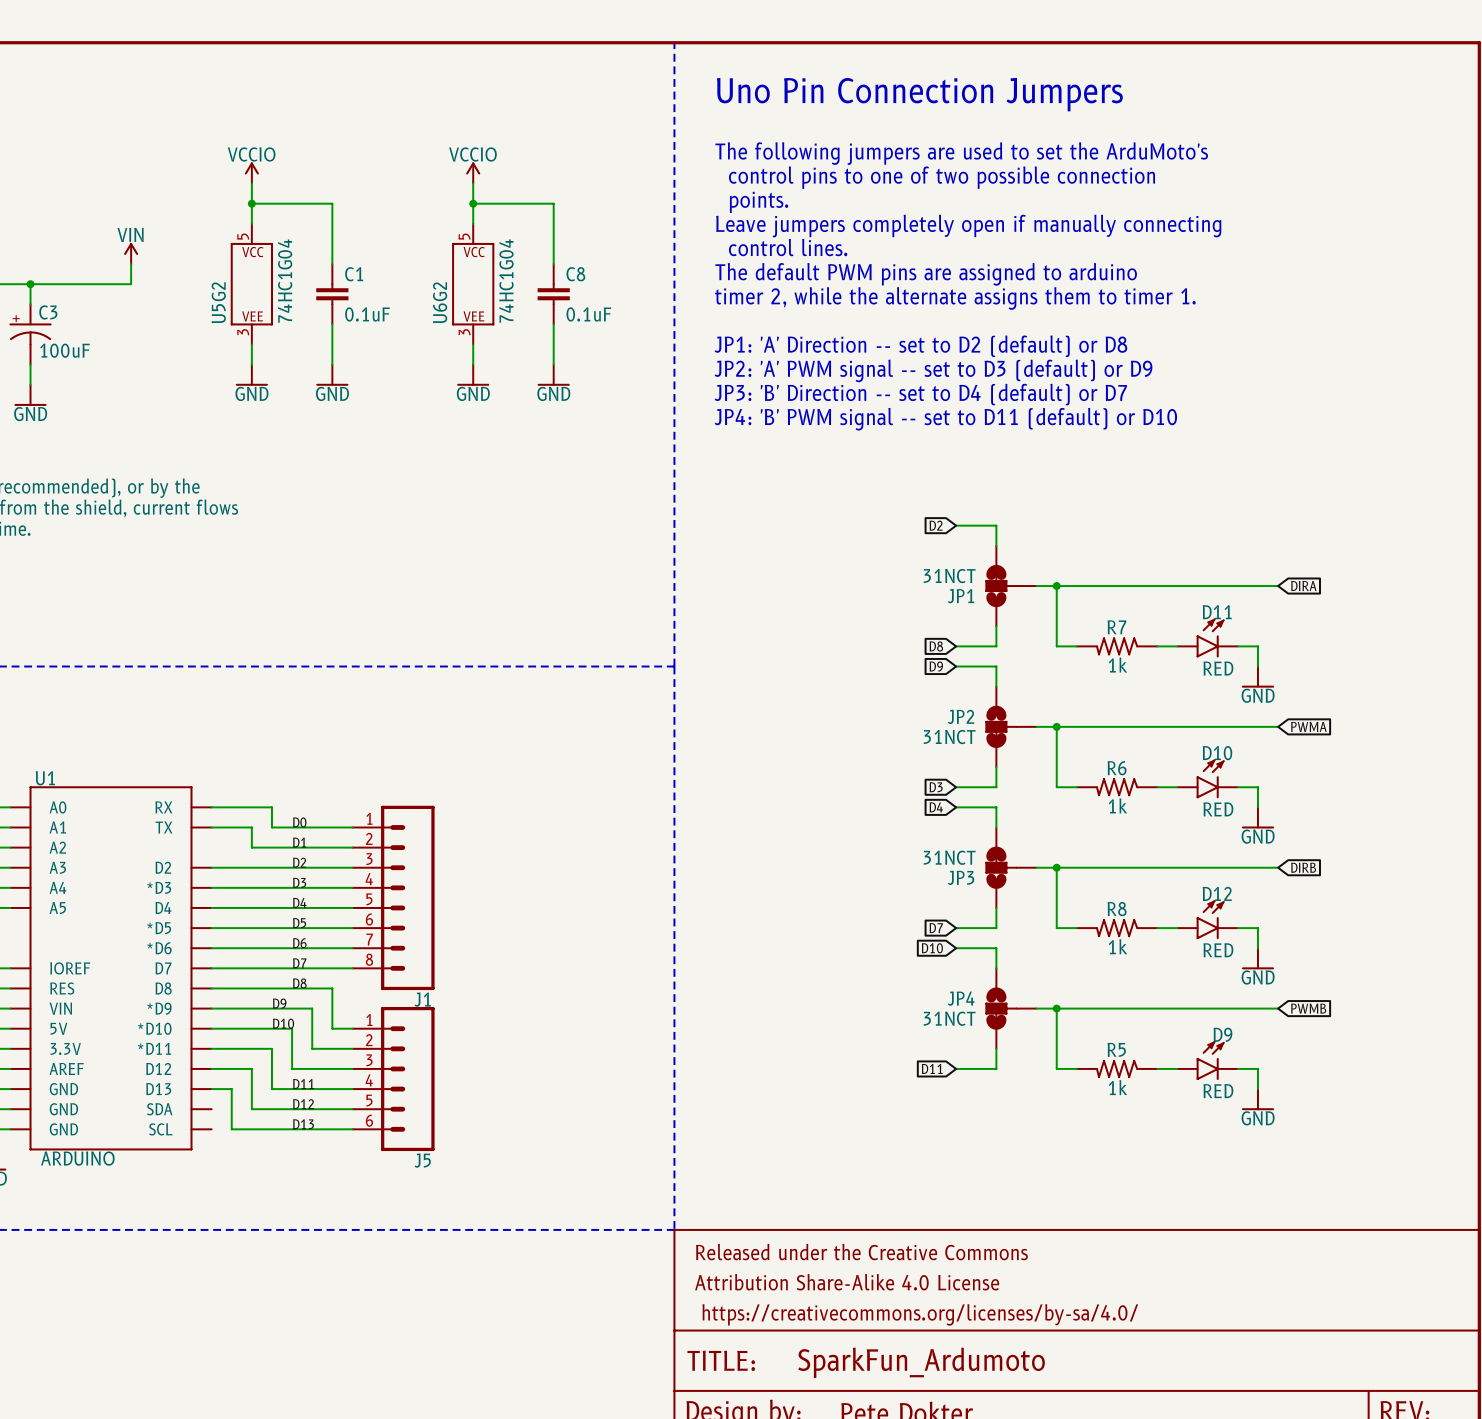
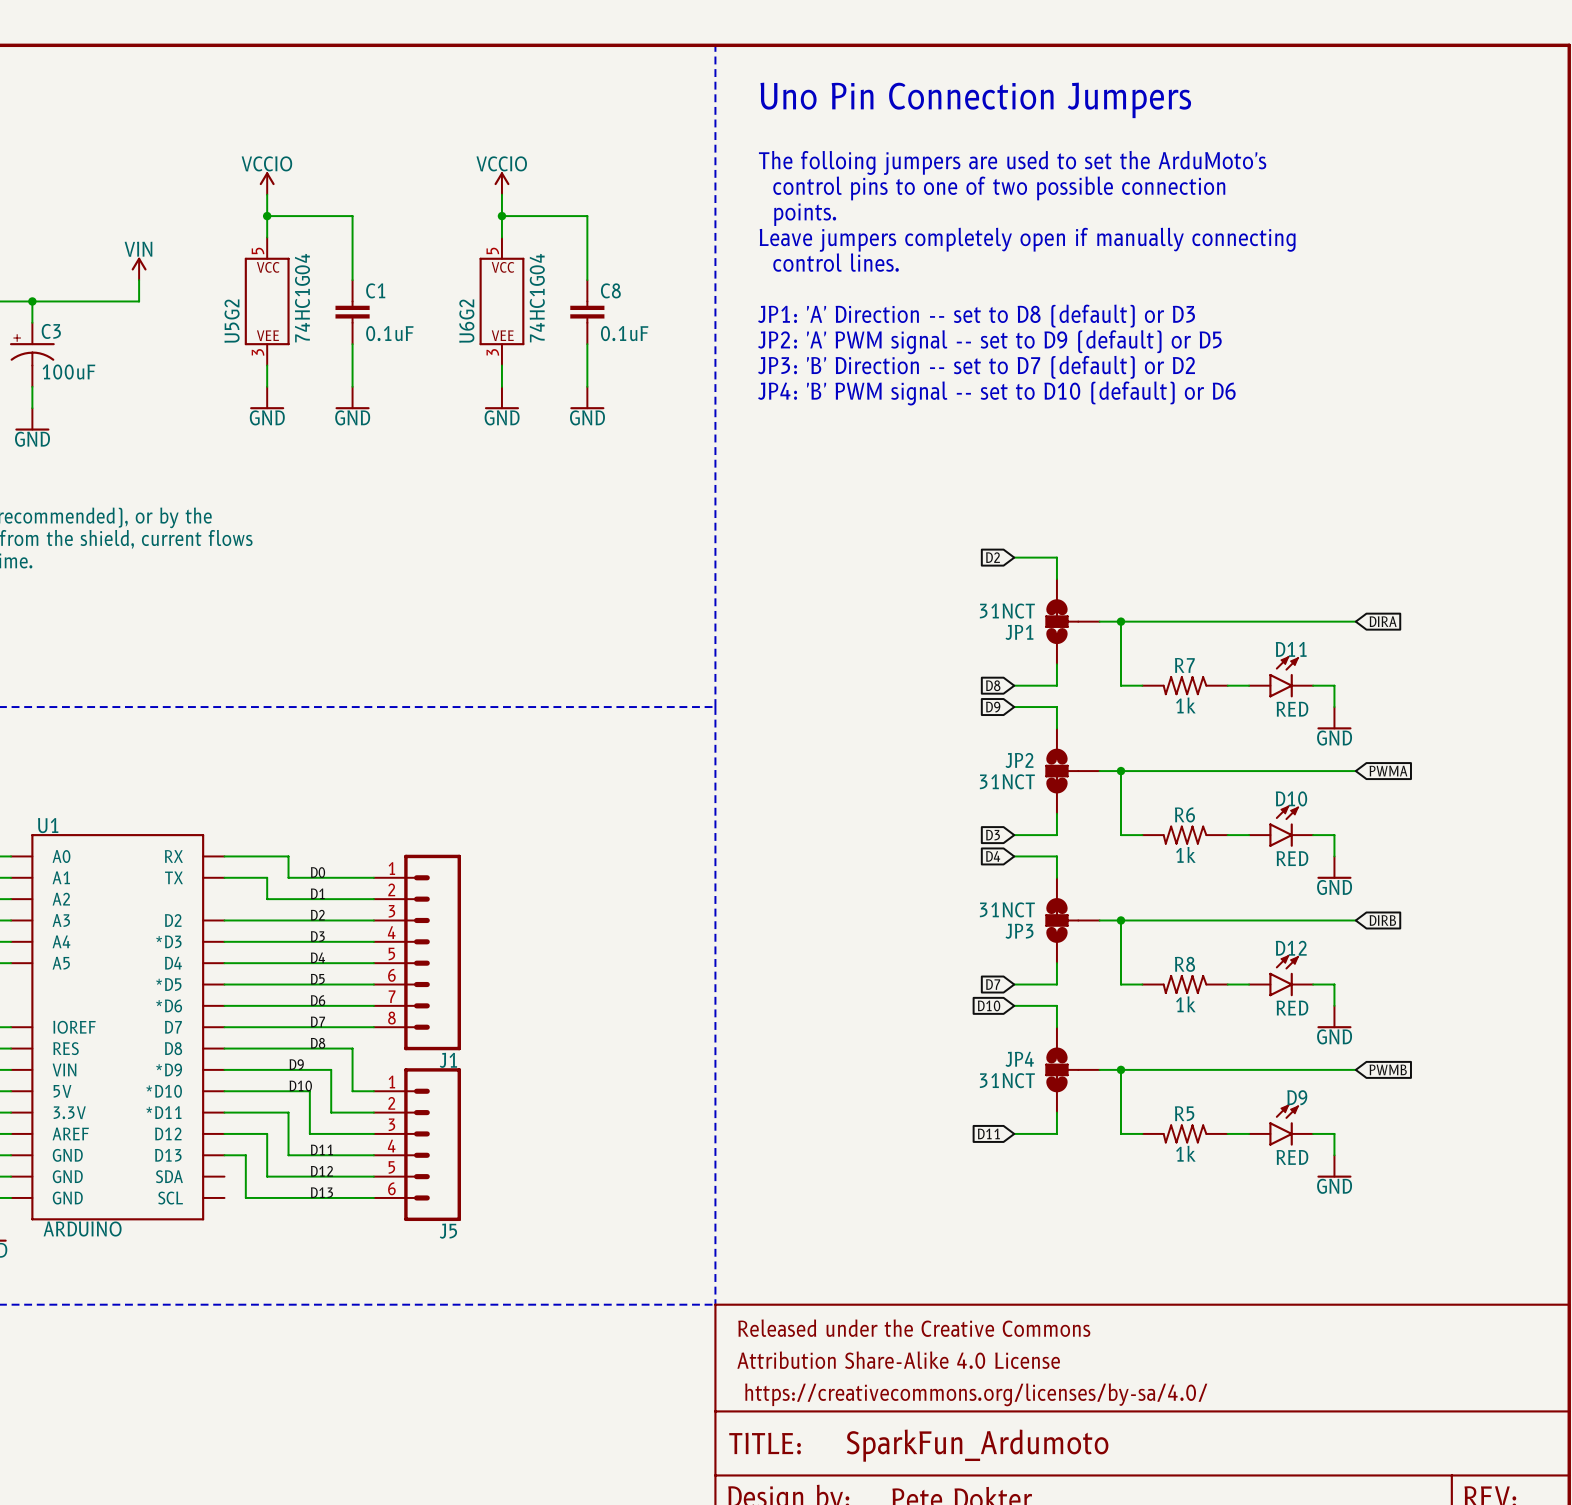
text: The following jumpers are used to set the ArduMoto's (961, 153) -> The folloing jumpers are used to set the ArduMoto's (1012, 162)
text: The default PWM pins are assigned to arduino (926, 274) -> none
text: timer 2, while the alternate assigns them to timer 1. (955, 298) -> JP1: 'A' Direction -- set to D8 (default) or D3 (976, 316)
text: none -> JP2: 'A' PWM signal -- set to D9 (default) or D5 (989, 342)
text: JP1: 'A' Direction -- set to D2 (default) or D8 (920, 346) -> JP3: 'B' Direction -- set to D7 (default) or D2 (976, 367)
text: JP2: 'A' PWM signal -- set to D3 (default) or D9 (933, 370) -> JP4: 'B' PWM signal -- set to D10 (default) or D6 (996, 393)
text: JP3: 'B' Direction -- set to D4 (default) or D7 (920, 394) -> none
text: JP4: 'B' PWM signal -- set to D11 (default) or D10 (945, 419) -> none

